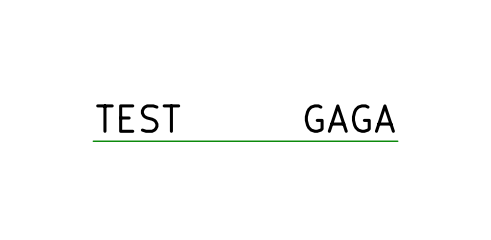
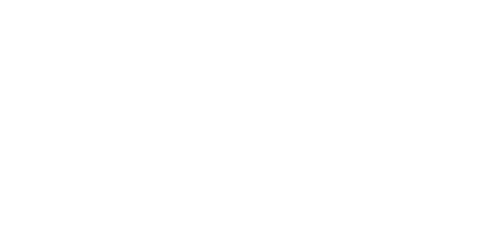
label: TEST (138, 118) -> none
label: GAGA (349, 118) -> none
wire: (93, 141) (397, 141) -> none

